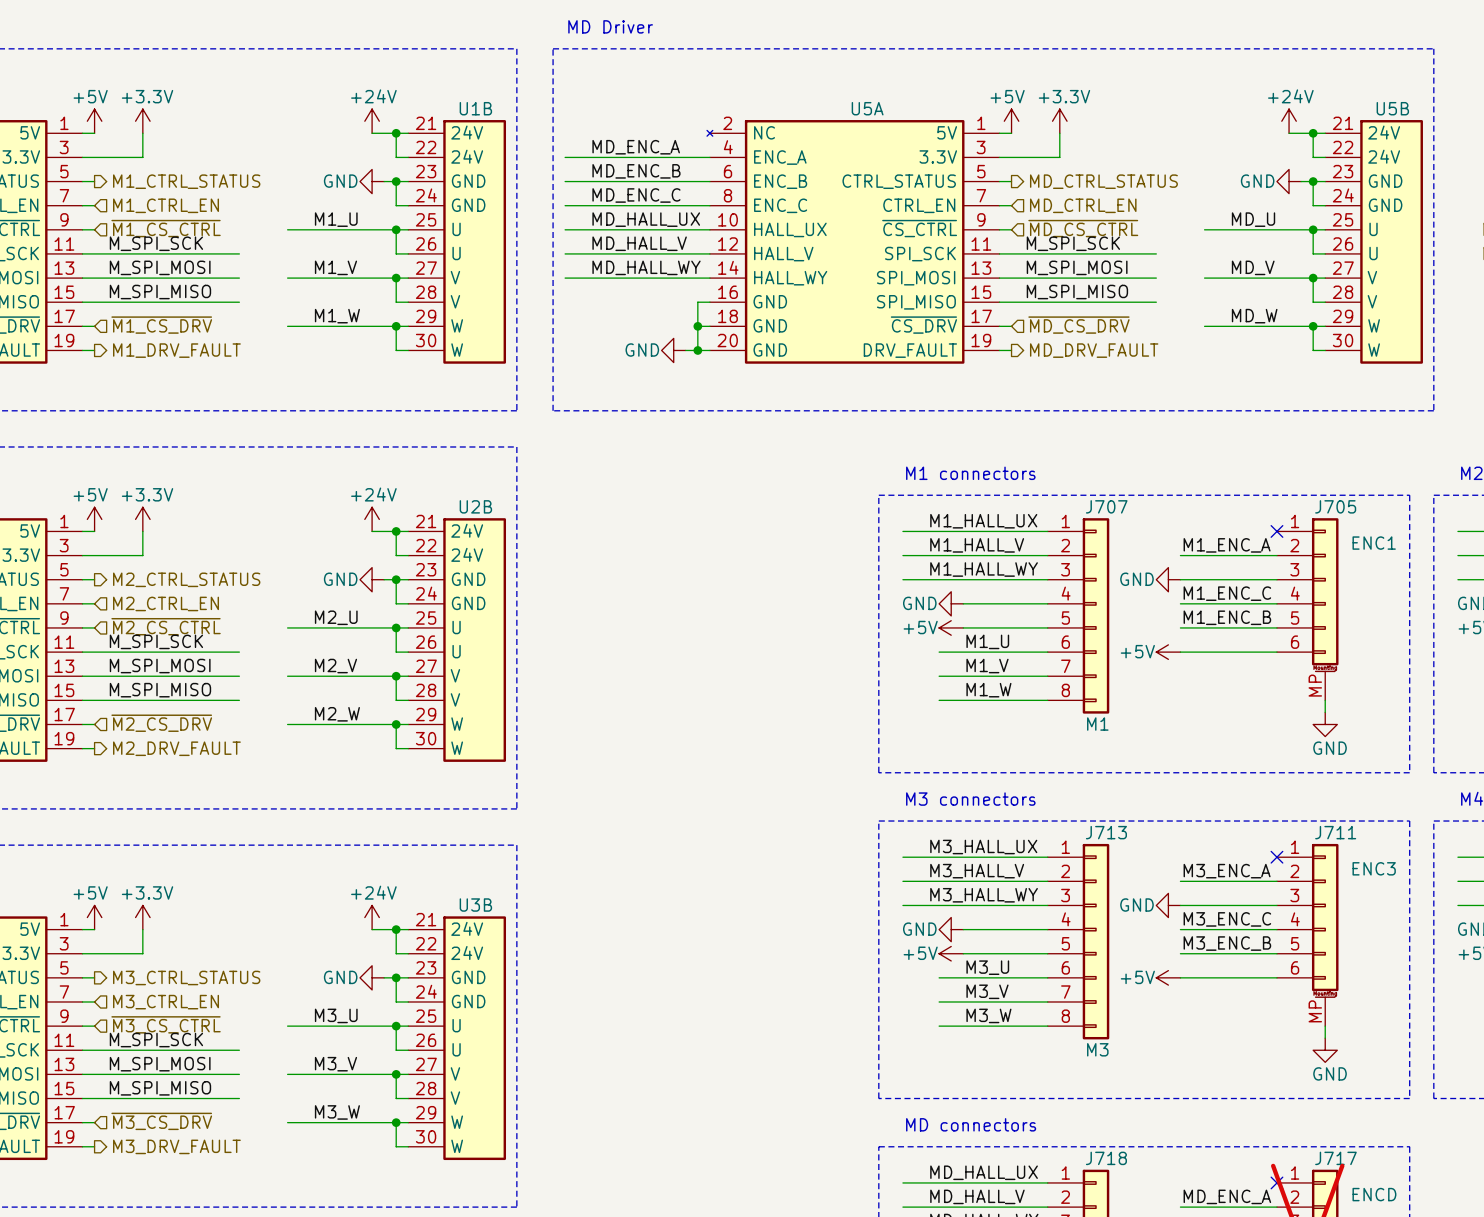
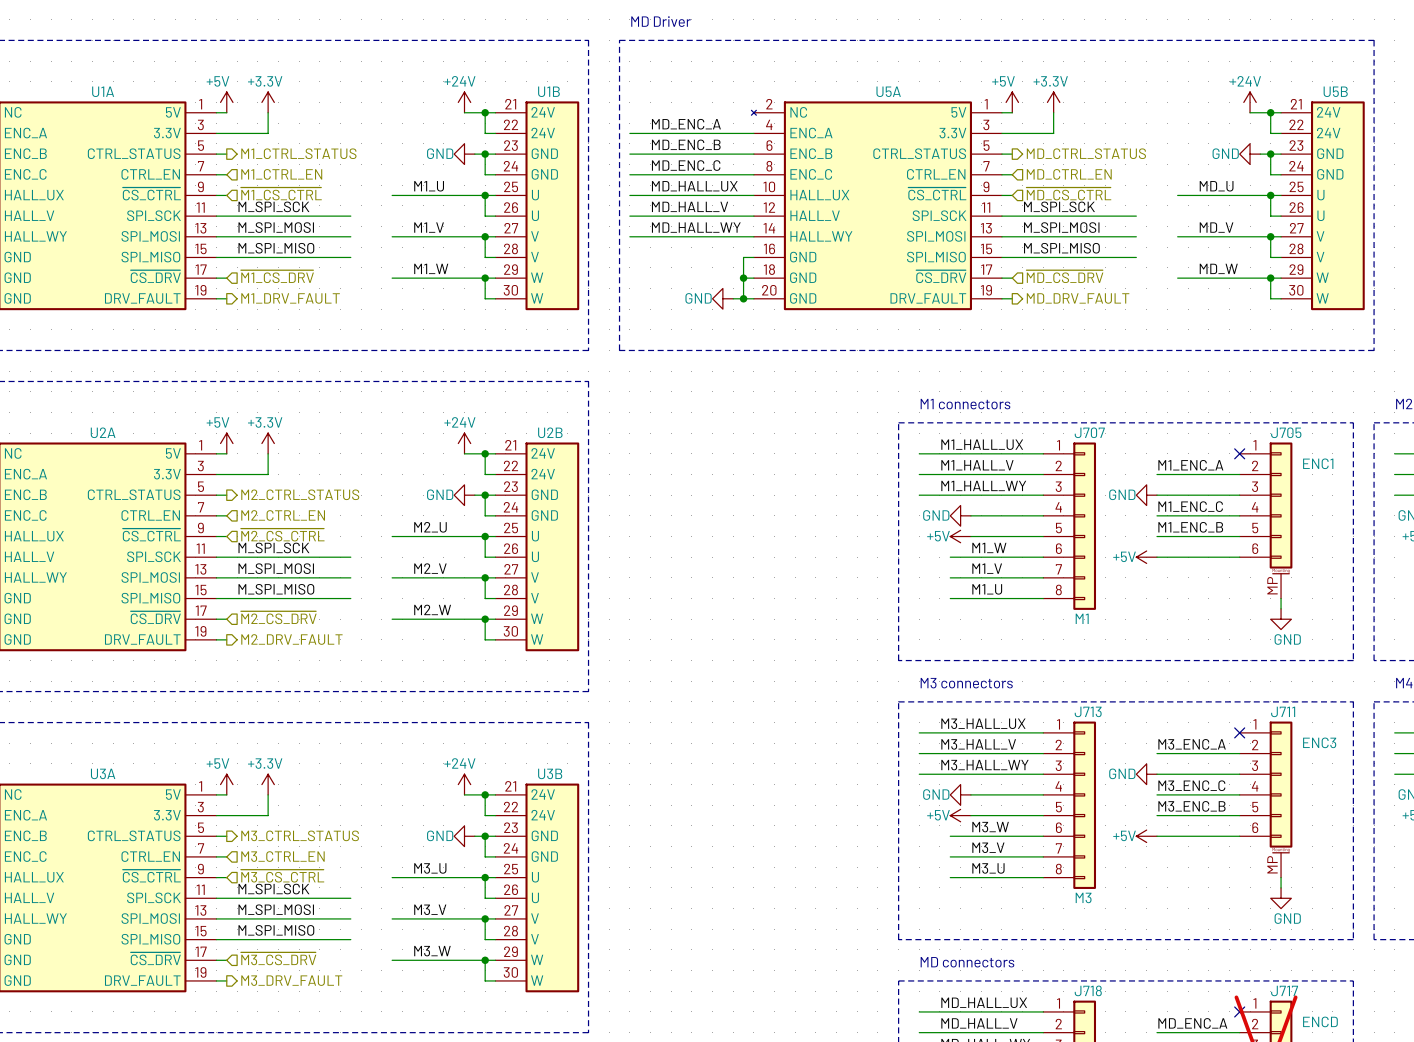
label: M1_U (987, 641) -> M1_W (989, 547)
label: M1_W (988, 690) -> M1_U (987, 589)
label: M3_U (987, 967) -> M3_W (990, 827)
label: M3_W (988, 1015) -> M3_U (988, 868)

